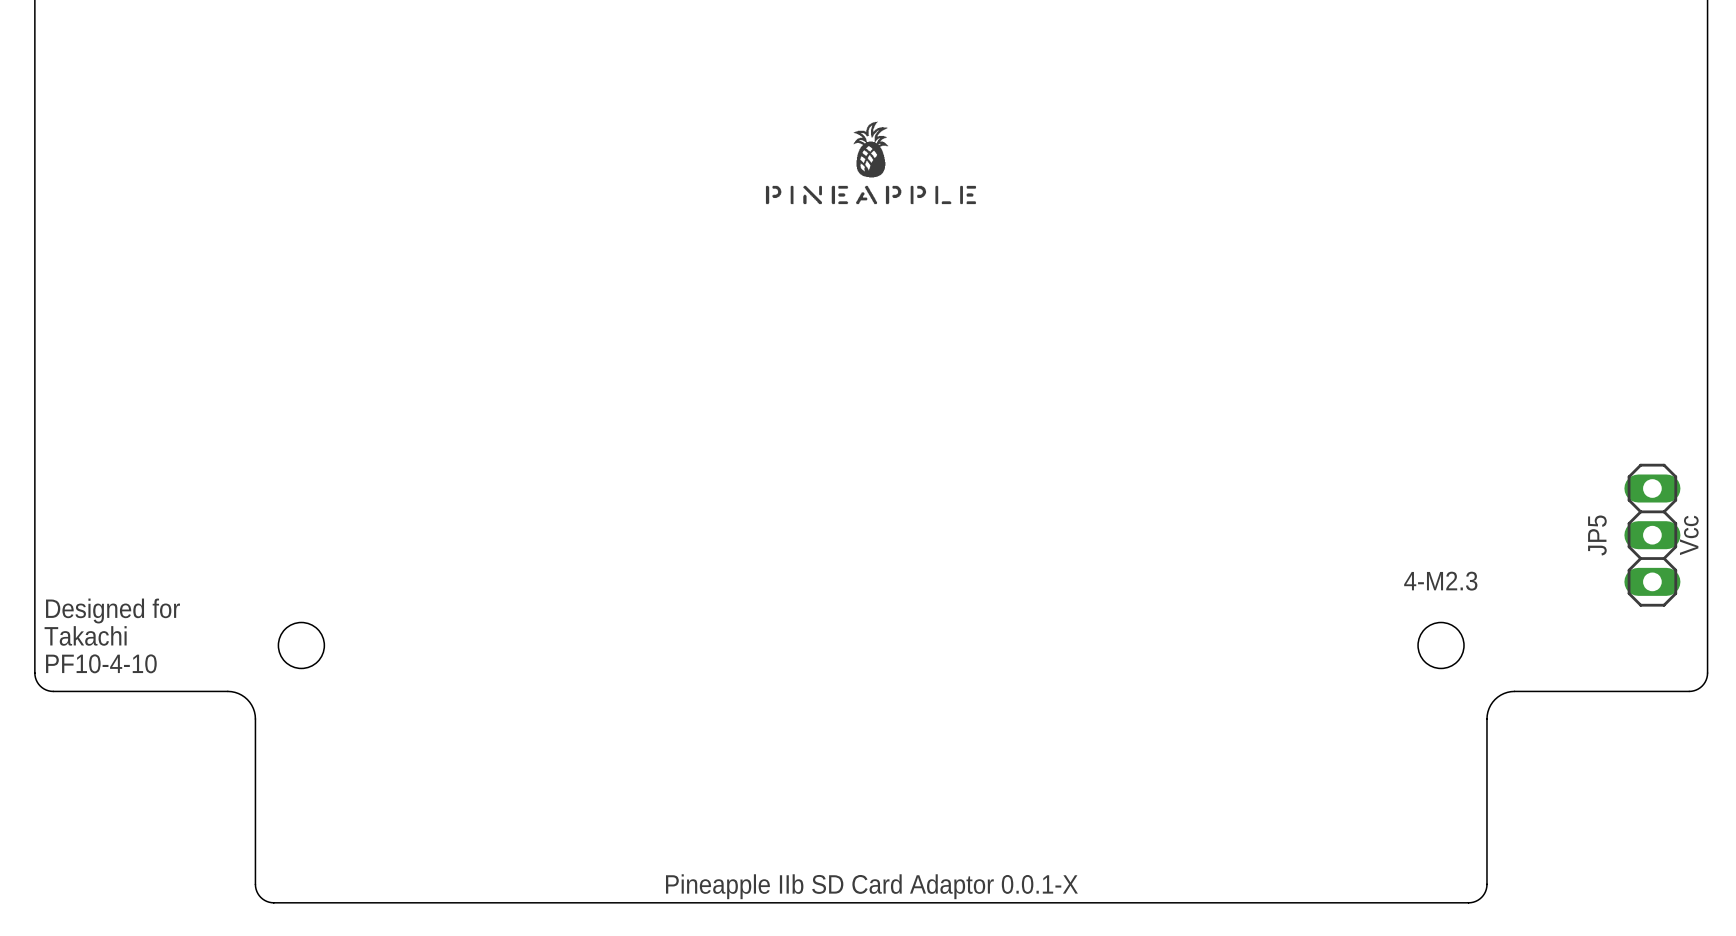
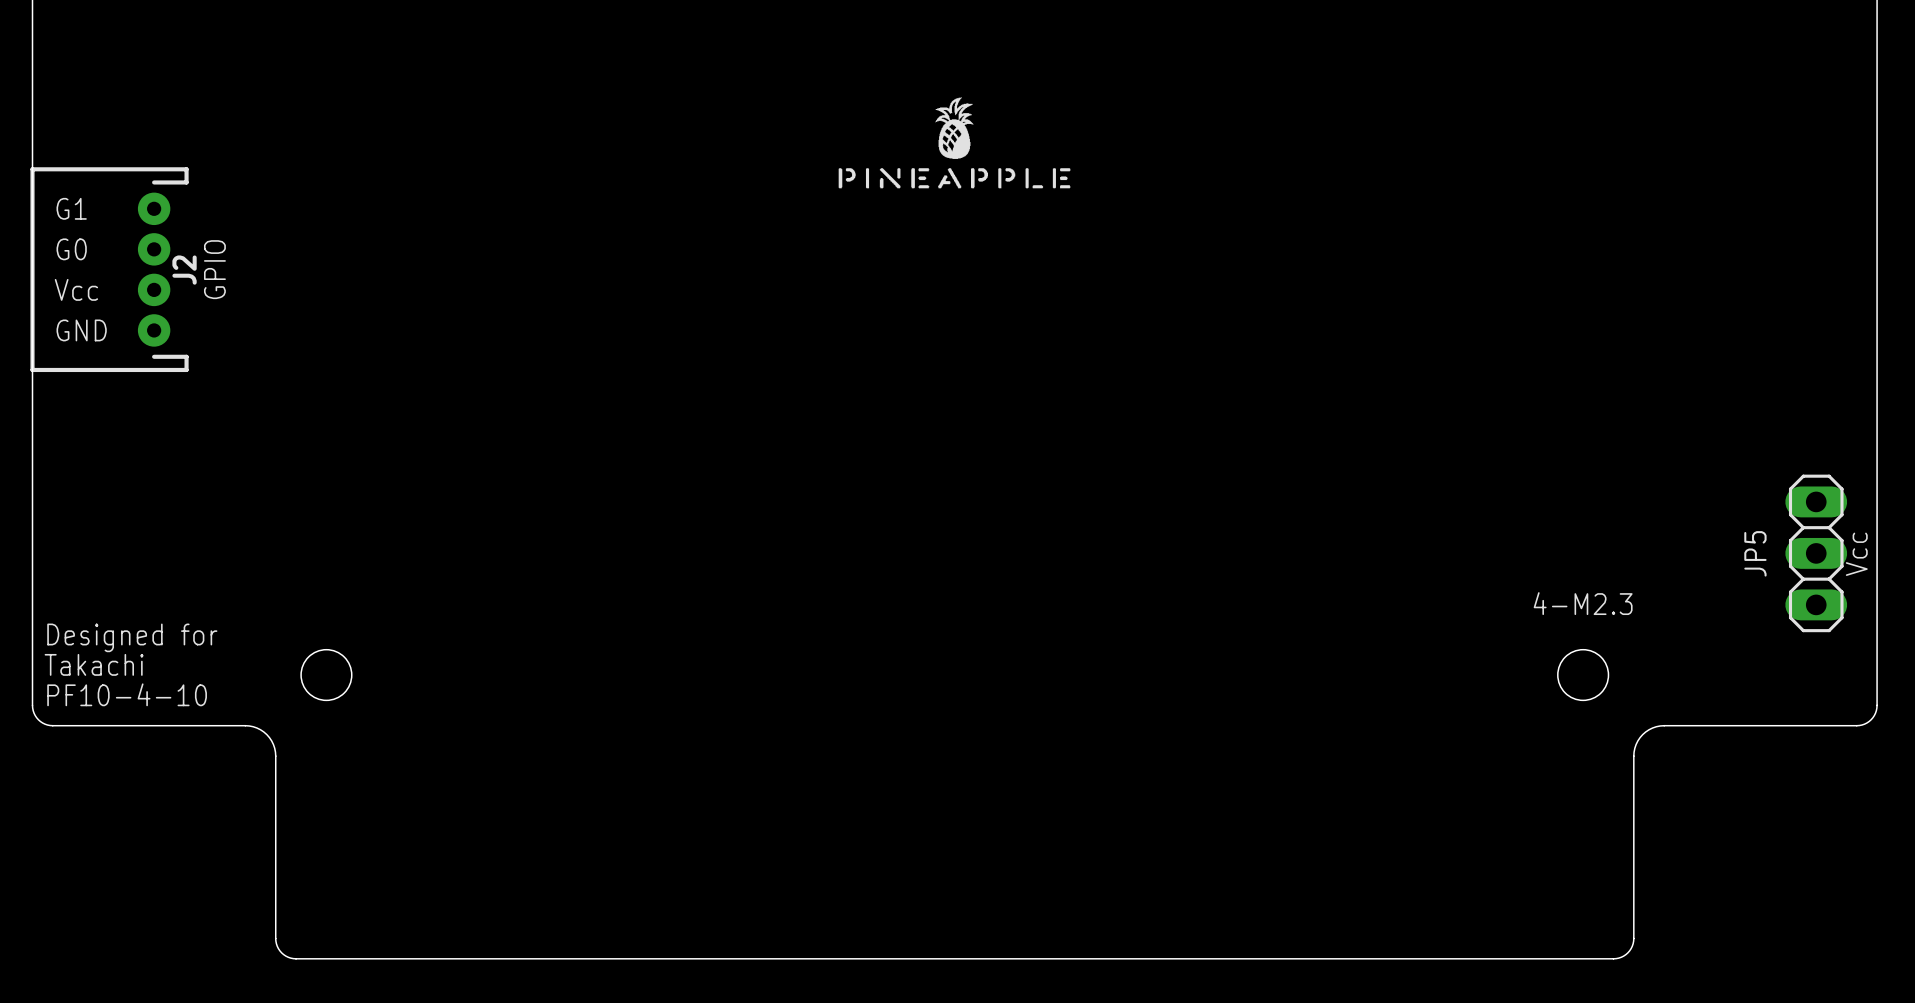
text: none -> G1 (71, 208)
text: none -> G0 (71, 249)
J2: none -> (109, 269)
text: none -> GPIO (214, 269)
text: none -> Vcc (76, 289)
text: none -> GND (81, 330)
text: Pineapple IIb SD Card Adaptor 0.0.1-X (871, 886) -> none

